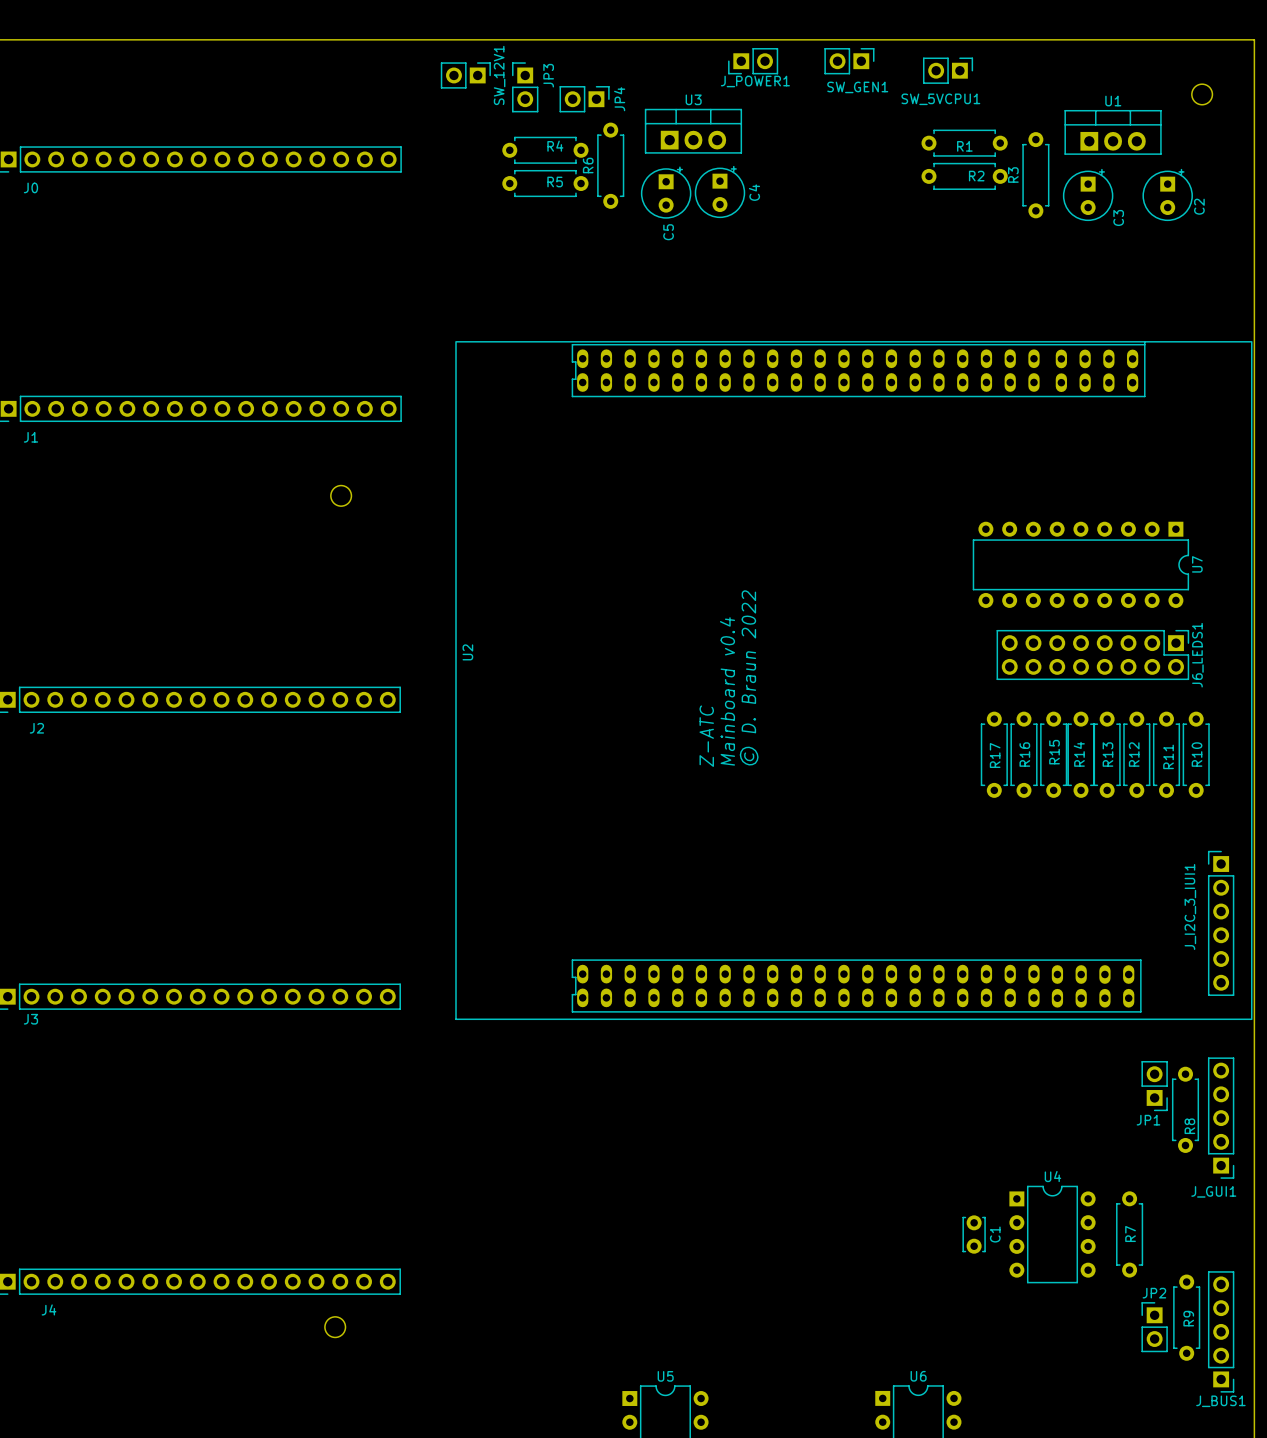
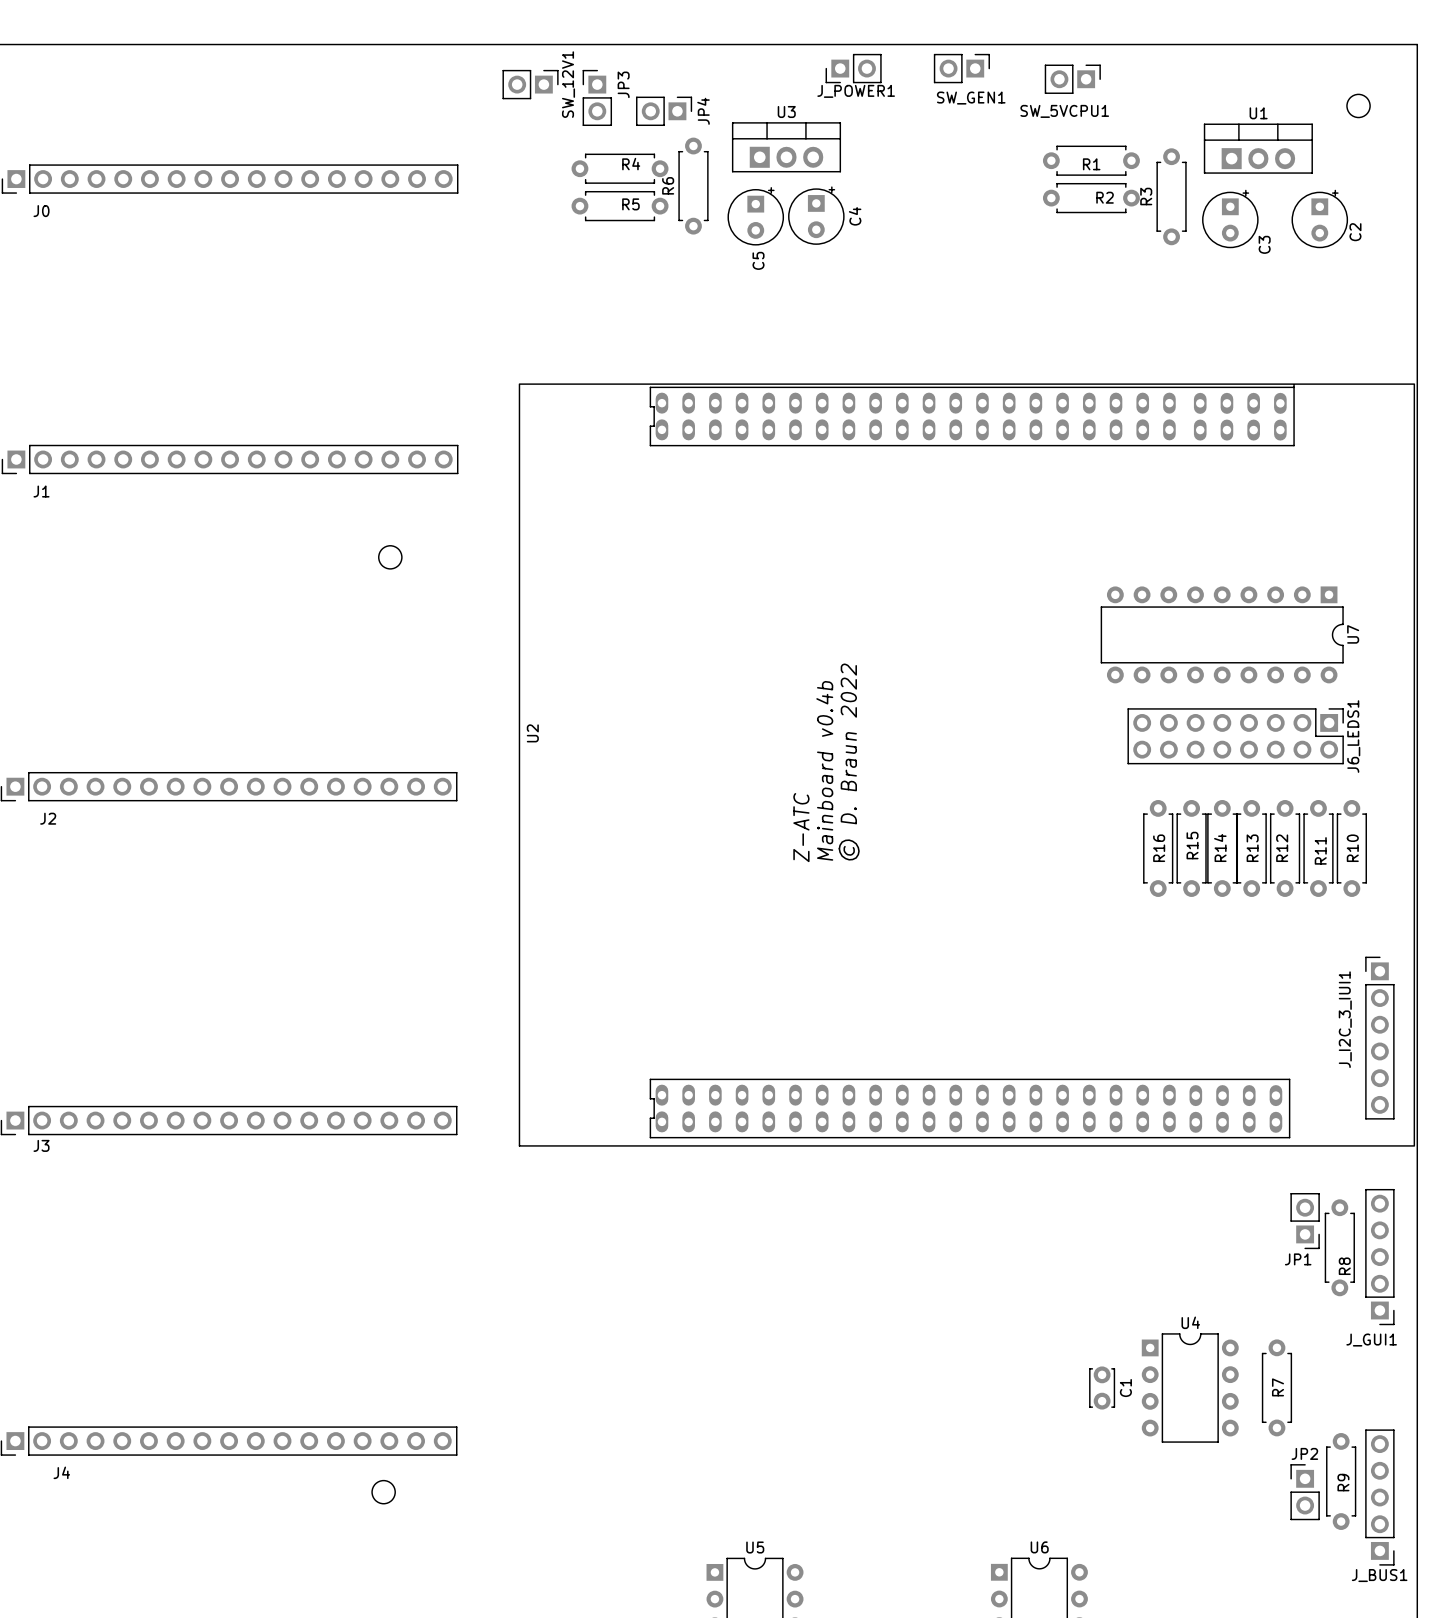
text: Mainboard v0.4 (727, 691) -> Mainboard v0.4b (824, 770)
R17: (994, 754) -> none

